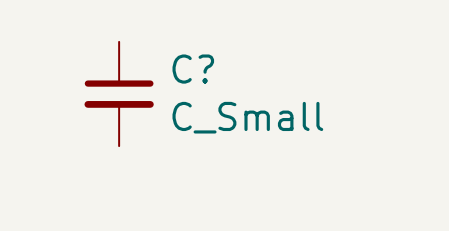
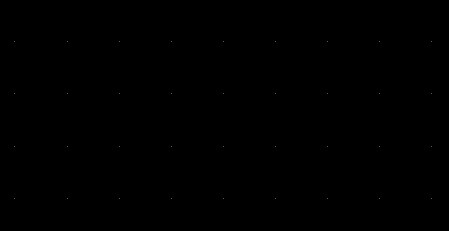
C?: C_Small (119, 93) -> none

